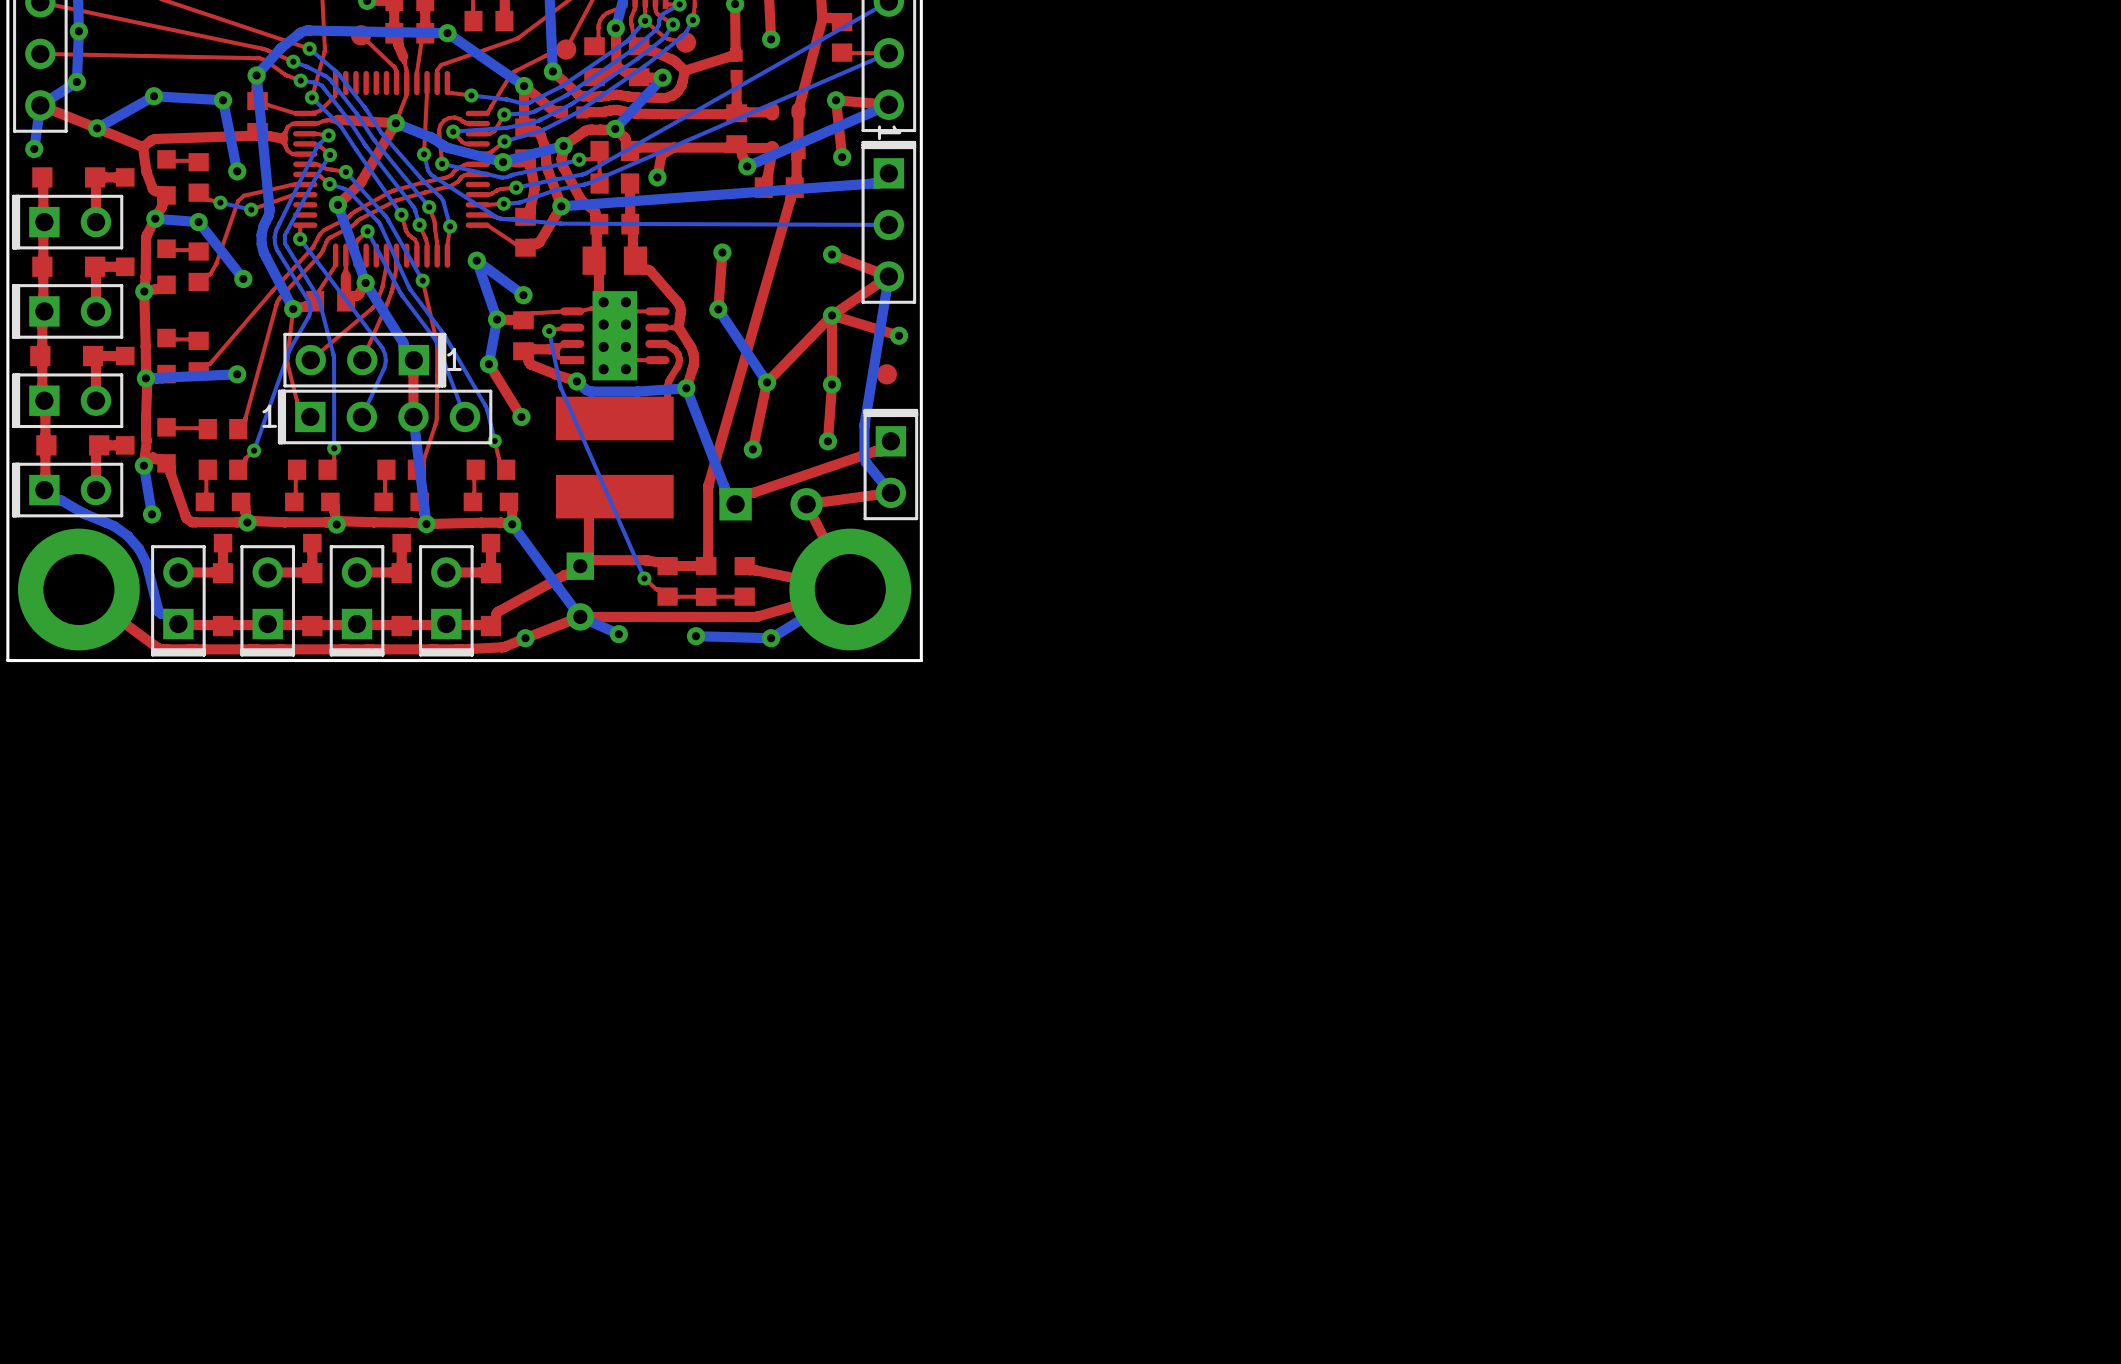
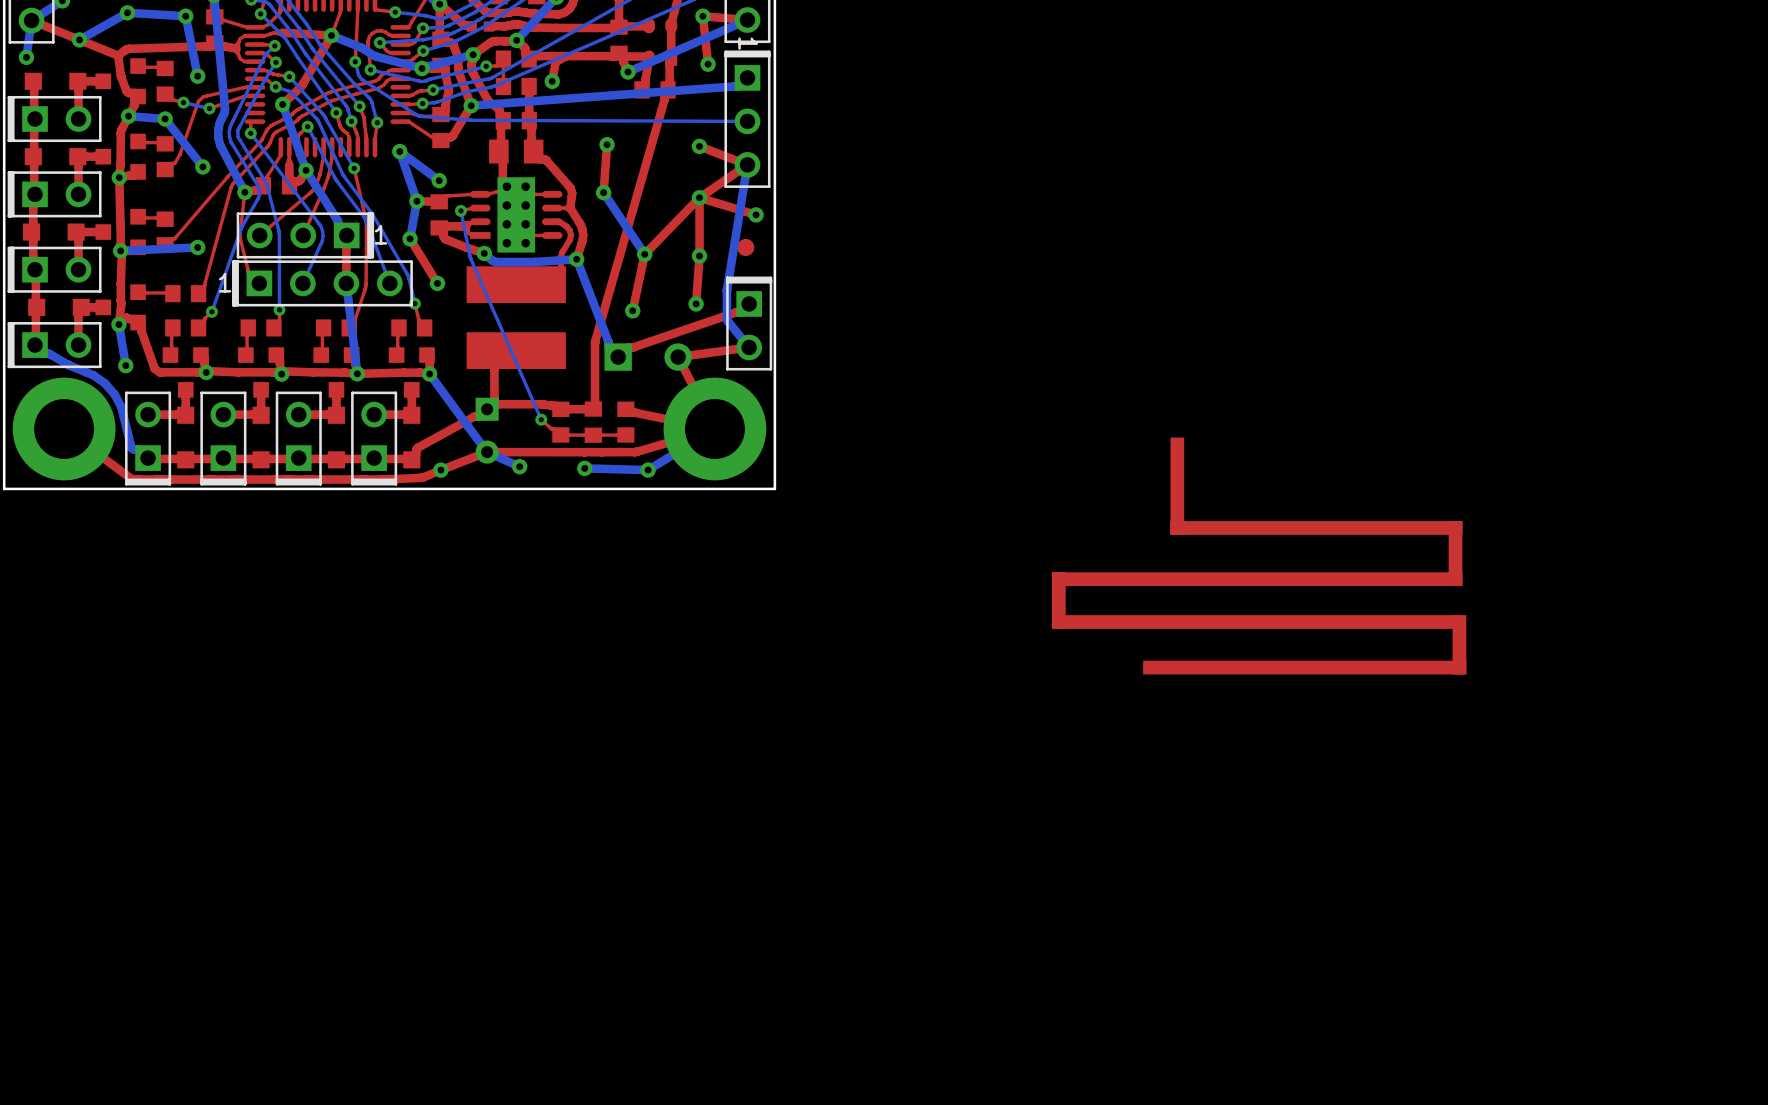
part: none -> (1259, 555)

